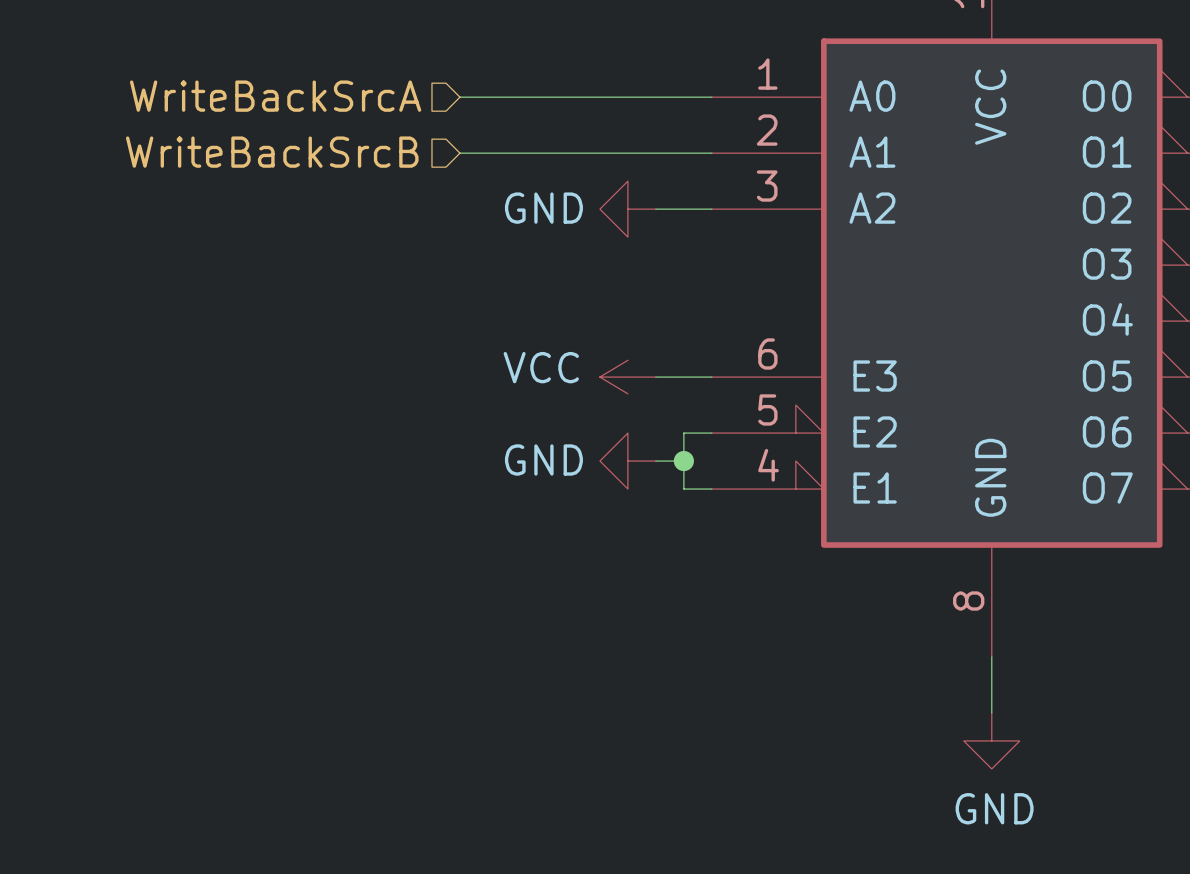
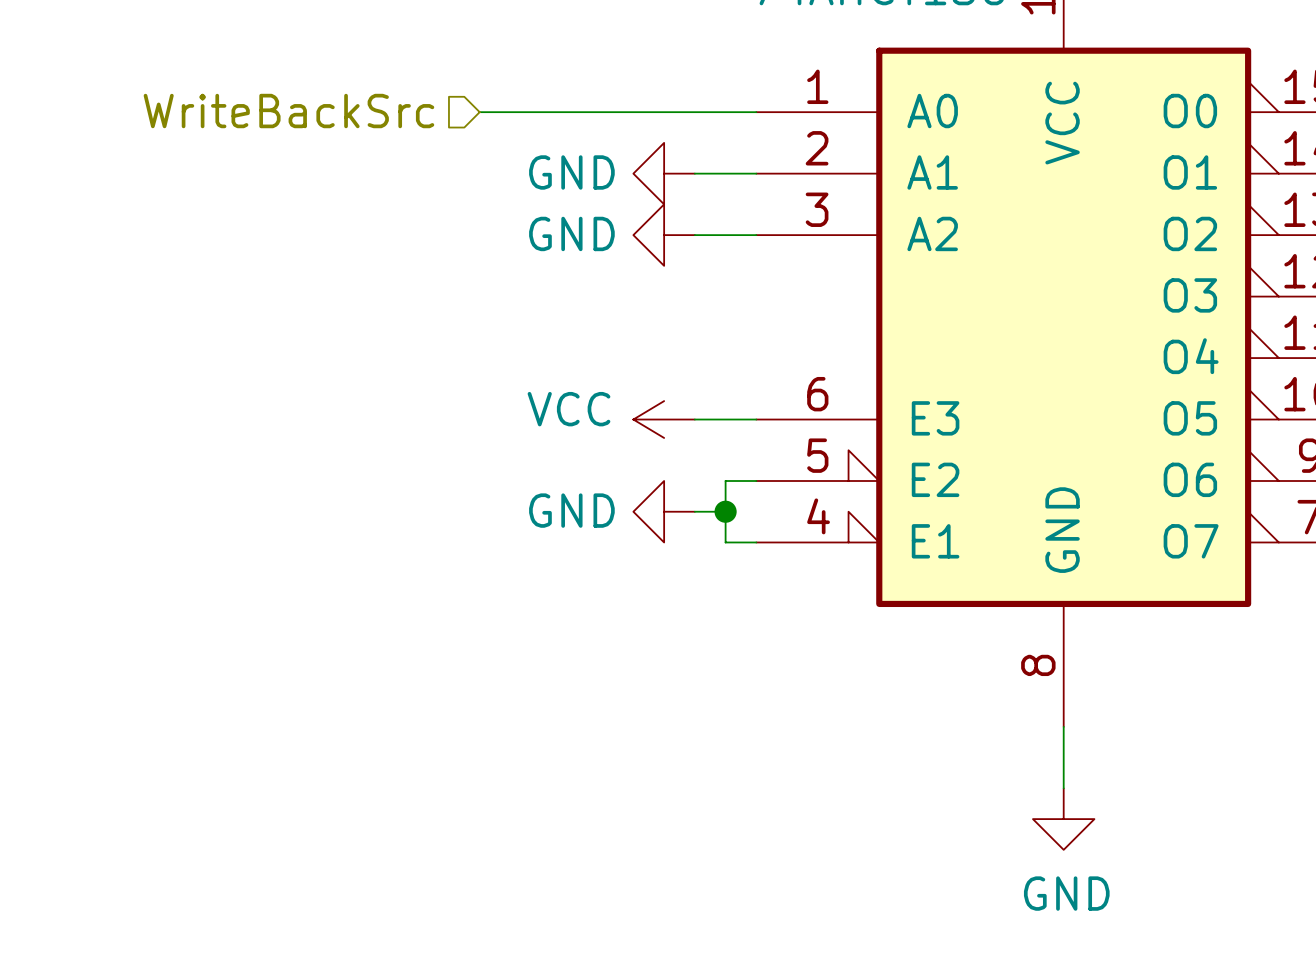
hierarchical label: WriteBackSrcA (275, 96) -> WriteBackSrc (288, 111)
hierarchical label: WriteBackSrcB (272, 152) -> none
wire: (459, 153) (655, 153) -> none
power symbol: none -> GND (664, 173)

